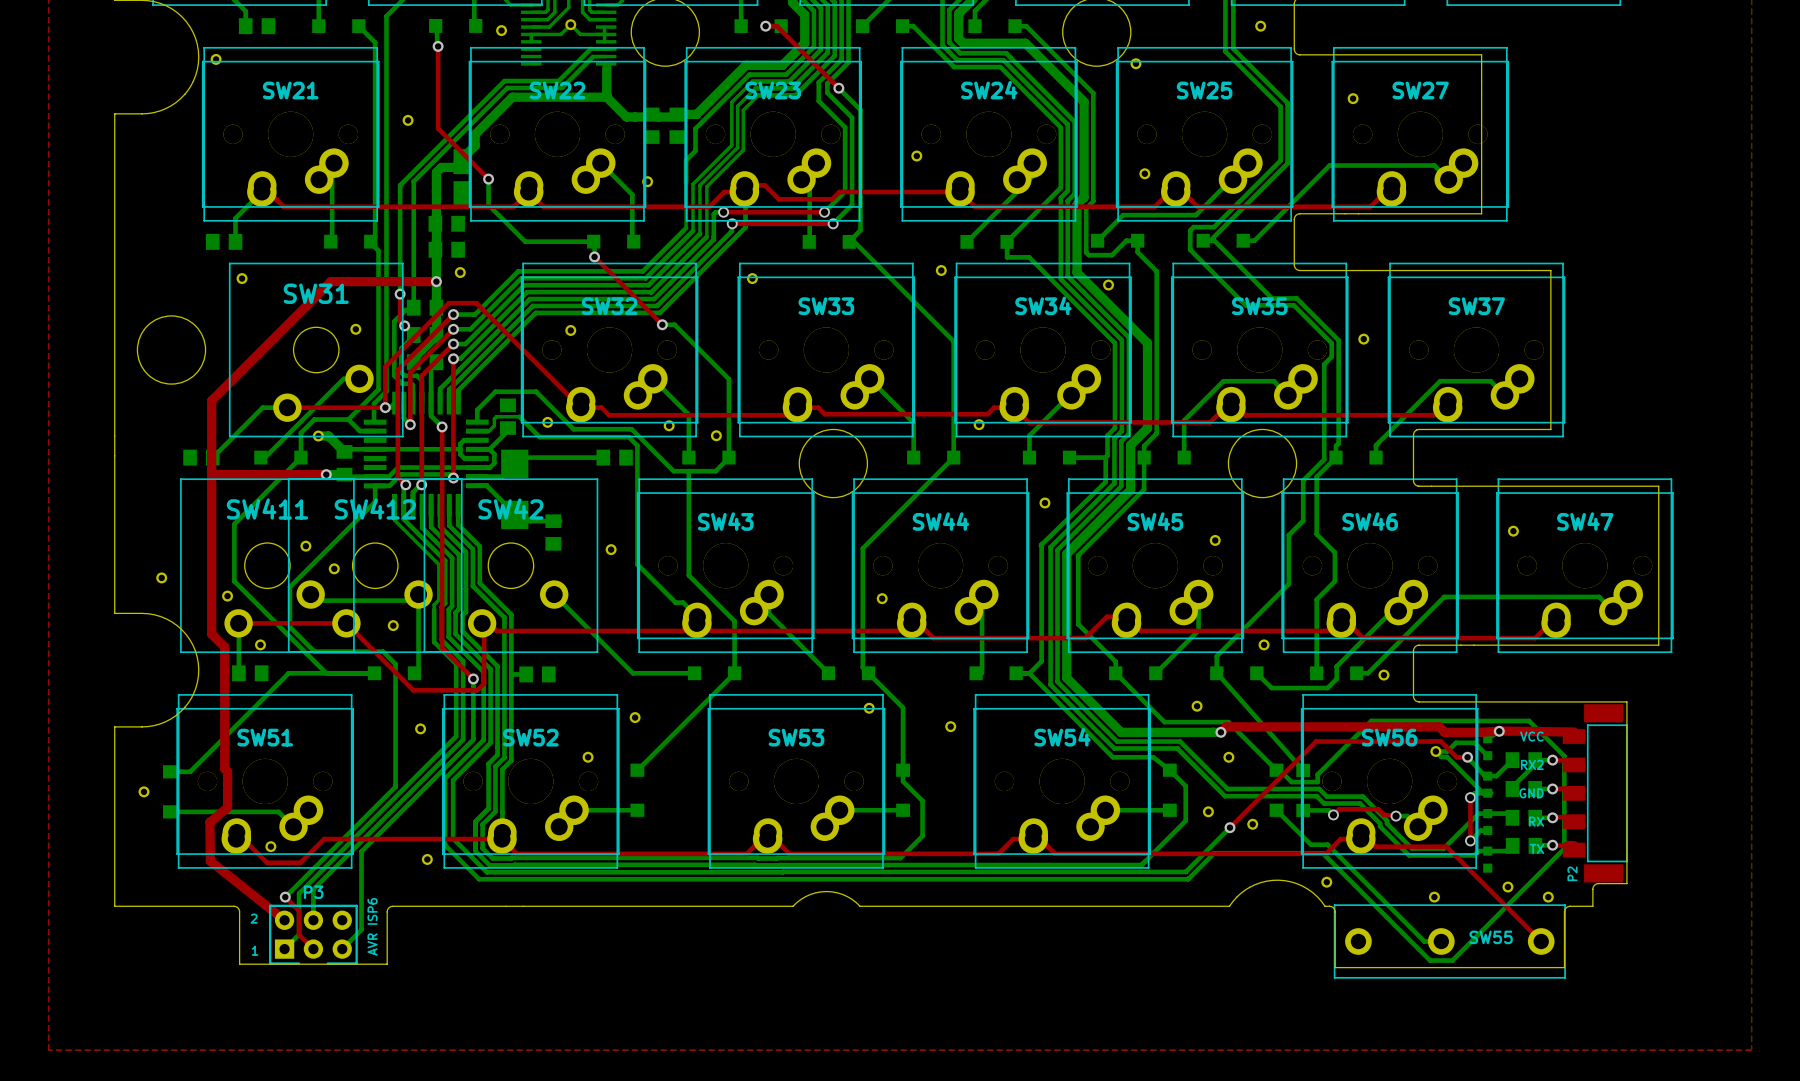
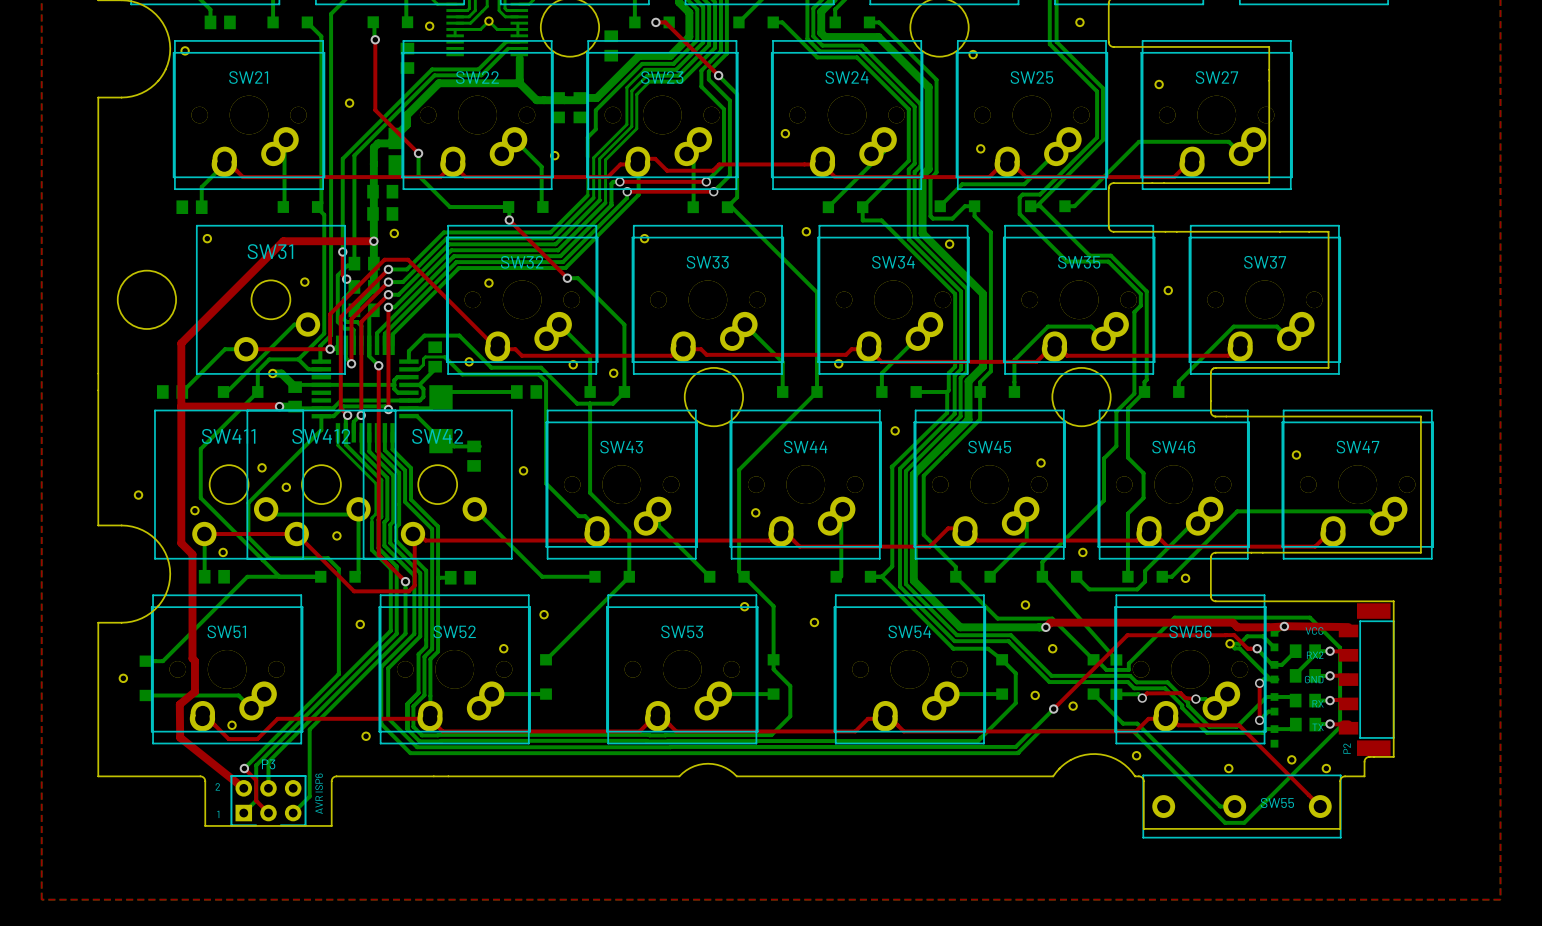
part: none -> (611, 45)
part: none -> (407, 58)

